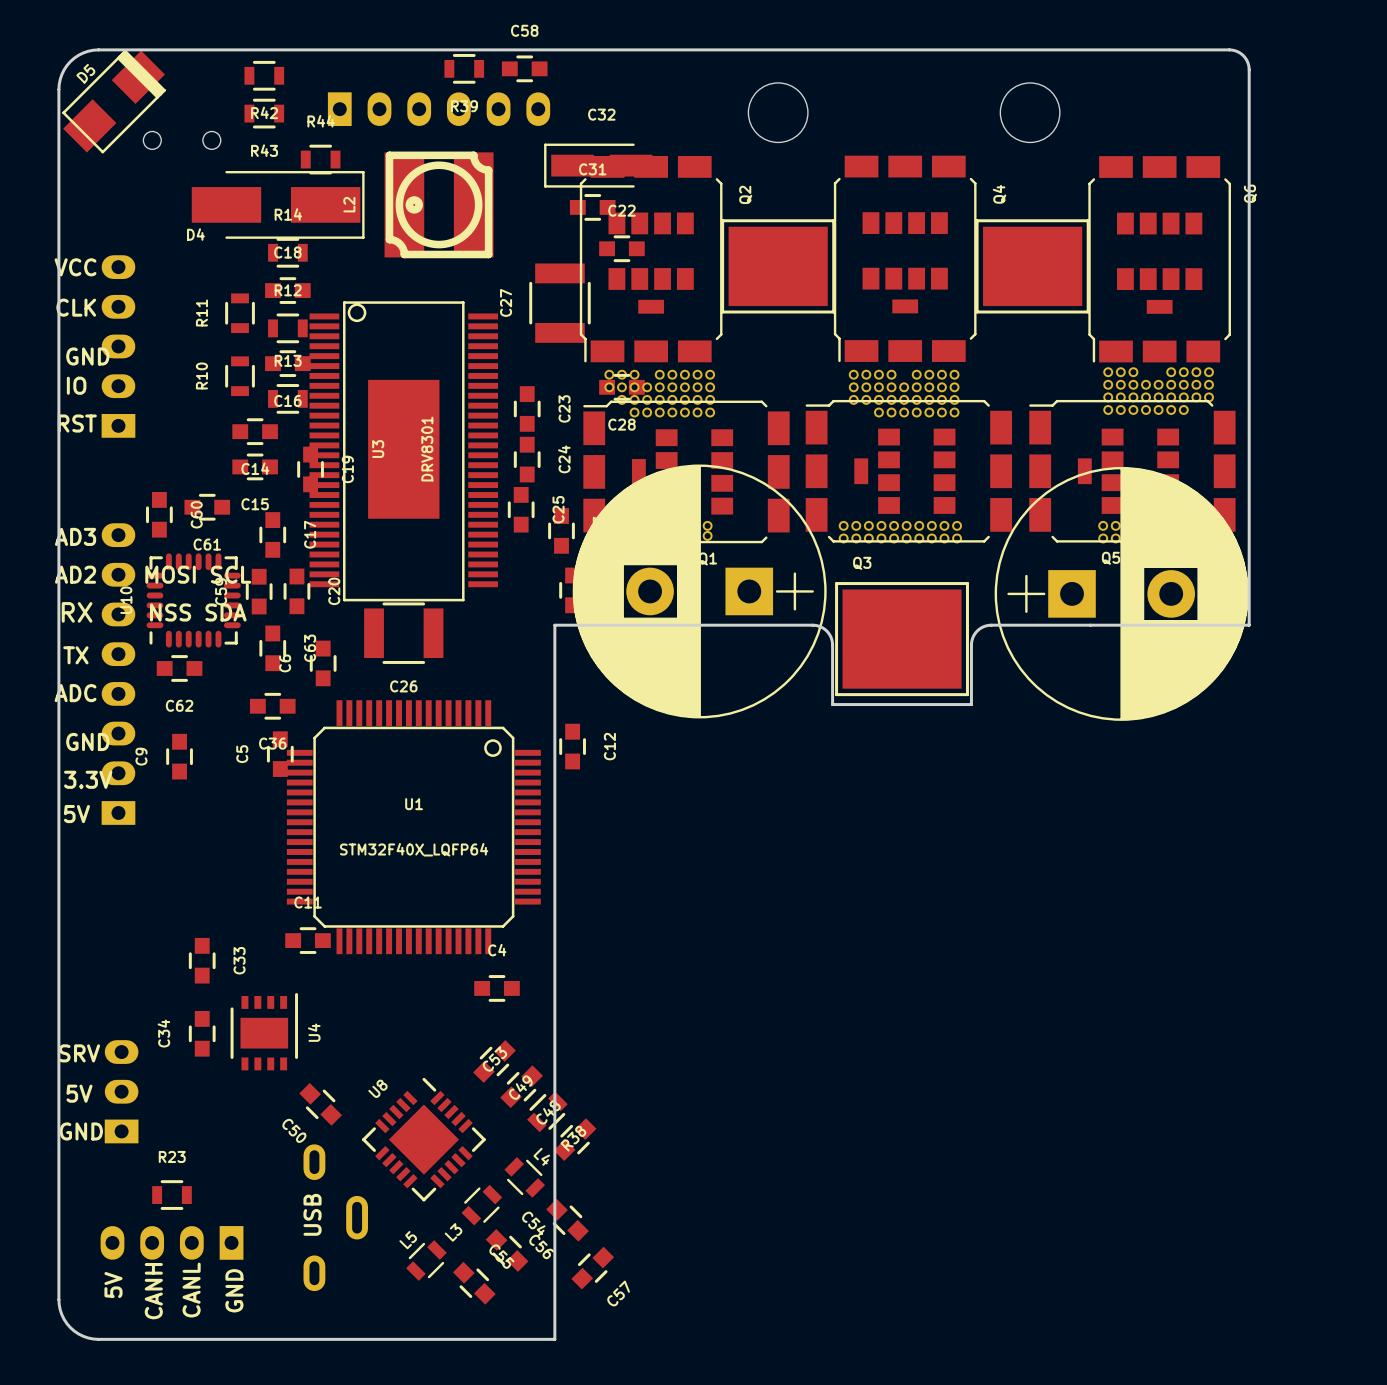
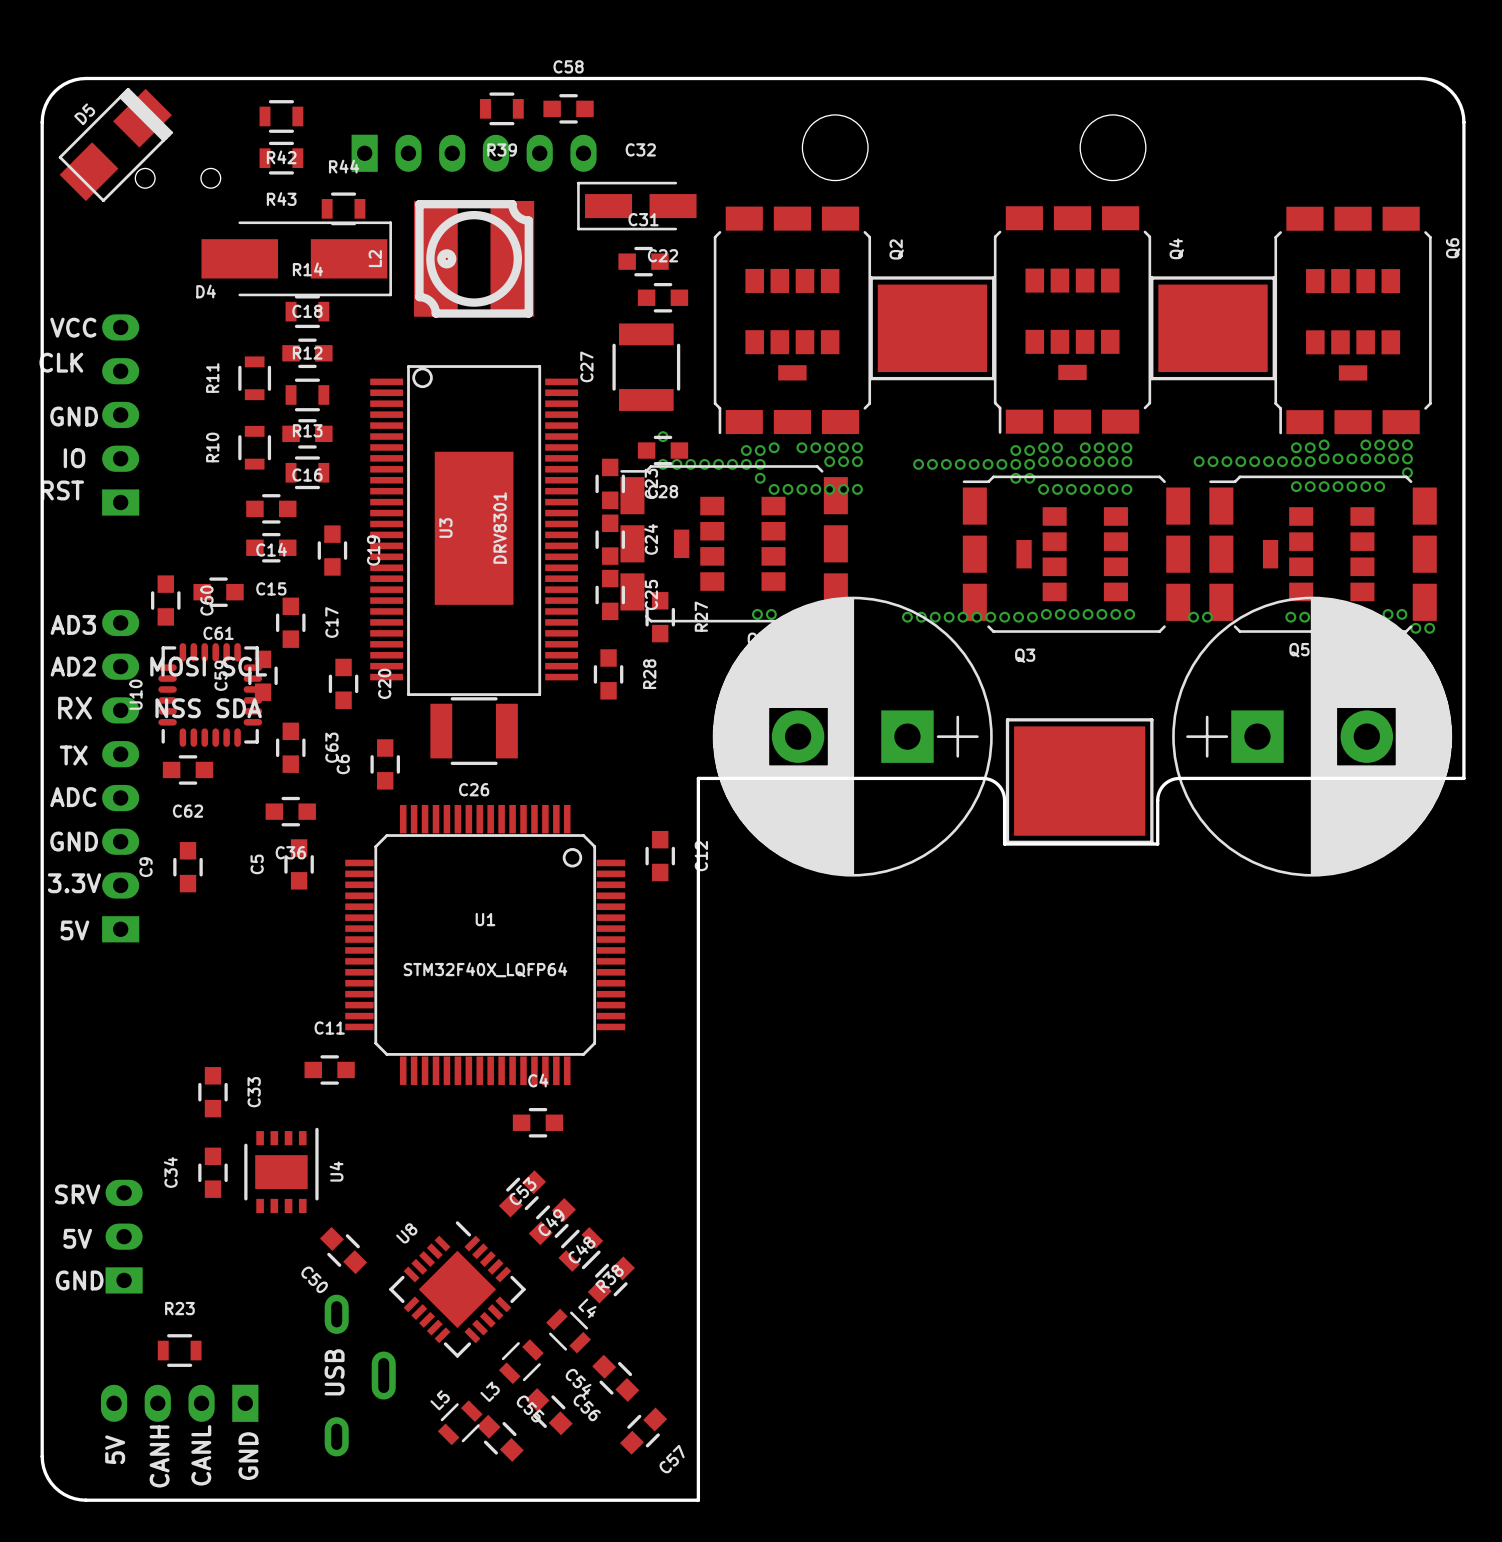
board edge: (1229, 49) (1236, 51) (1243, 55) (1247, 62) (1249, 69) (1249, 625) (986, 625) (975, 632) (971, 642) (971, 704) (832, 704) (831, 639) (826, 631) (815, 625) (554, 625) (554, 1339) -> (1332, 78) (1431, 79) (1451, 91) (1460, 105) (1463, 116) (1463, 778) (1173, 779) (1164, 784) (1158, 794) (1157, 844) (1004, 844) (1003, 794) (998, 784) (985, 778) (698, 778) (698, 1500) (589, 1500)
R39 position: (464, 68) -> (501, 108)
C58 position: (524, 68) -> (568, 108)
R42 position: (264, 75) -> (281, 116)
D5 position: (114, 101) -> (115, 144)
part position: (439, 109) -> (474, 153)
R43 position: (264, 113) -> (281, 158)
R44 position: (320, 159) -> (343, 208)
D4 position: (278, 204) -> (296, 258)
L2 position: (439, 204) -> (474, 258)
C31 position: (592, 207) -> (643, 261)
R14 position: (287, 252) -> (307, 311)
Q4 position: (905, 258) -> (1072, 320)
Q2 position: (651, 259) -> (792, 320)
Q6 position: (1159, 259) -> (1353, 320)
part: (778, 266) -> none
part: (1032, 266) -> none
text position: VCC (75, 267) -> VCC (73, 327)
part: none -> (932, 328)
part: none -> (1213, 328)
C18 position: (287, 290) -> (307, 353)
C27 position: (559, 303) -> (646, 367)
R11 position: (240, 313) -> (254, 378)
R12 position: (287, 328) -> (307, 394)
part position: (118, 346) -> (120, 414)
C16 position: (287, 363) -> (307, 433)
part: (1108, 372) -> none
part: (1120, 372) -> none
part: (1133, 372) -> none
part: (1171, 372) -> none
part: (1183, 372) -> none
part: (1196, 372) -> none
part: (1208, 372) -> none
part: (609, 374) -> none
part: (634, 374) -> none
part: (659, 374) -> none
part: (672, 374) -> none
part: (684, 374) -> none
part: (697, 374) -> none
part: (710, 374) -> none
part: (853, 374) -> none
part: (866, 374) -> none
part: (878, 374) -> none
part: (891, 374) -> none
part: (916, 374) -> none
part: (929, 374) -> none
part: (941, 374) -> none
part: (954, 374) -> none
R10 position: (240, 376) -> (254, 447)
part: none -> (1324, 444)
part: none -> (1365, 444)
part: none -> (1379, 444)
part: none -> (1393, 444)
part: none -> (1407, 444)
part: none -> (774, 447)
part: none -> (801, 447)
part: none -> (815, 447)
part: none -> (829, 447)
part: none -> (843, 447)
part: none -> (857, 447)
part: none -> (1043, 447)
part: none -> (1057, 447)
part: none -> (1085, 447)
part: none -> (1099, 447)
part: none -> (1113, 447)
part: none -> (1126, 447)
part: (1108, 384) -> none
part: (1120, 384) -> none
part: (1133, 384) -> none
part: (1146, 384) -> none
part: (1158, 384) -> none
part: (1171, 384) -> none
part: (1183, 384) -> none
text position: IO (76, 385) -> IO (74, 458)
part: (609, 387) -> none
part: (621, 387) -> none
part: (634, 387) -> none
part: (647, 387) -> none
part: (659, 387) -> none
part: (672, 387) -> none
part: (684, 387) -> none
part: (853, 387) -> none
part: (866, 387) -> none
part: (878, 387) -> none
part: (891, 387) -> none
part: (904, 387) -> none
part: (916, 387) -> none
part: (929, 387) -> none
part: none -> (1324, 458)
part: none -> (1338, 458)
part: none -> (1351, 458)
part: none -> (1365, 458)
part: none -> (1379, 458)
part: none -> (1393, 458)
part: none -> (1407, 458)
part: none -> (829, 461)
part: none -> (843, 461)
part: none -> (857, 461)
part: none -> (1043, 461)
part: none -> (1057, 461)
part: none -> (1071, 461)
part: none -> (1085, 461)
part: none -> (1099, 461)
part: none -> (1113, 461)
part: none -> (1126, 461)
R13 position: (287, 398) -> (307, 472)
part: none -> (1407, 472)
C23 position: (527, 408) -> (610, 483)
part: (1108, 409) -> none
part: (1120, 409) -> none
part: (1133, 409) -> none
part: (1146, 409) -> none
part: (1158, 409) -> none
part: (1171, 409) -> none
part: (1183, 409) -> none
part: (634, 412) -> none
part: (647, 412) -> none
part: (659, 412) -> none
part: (672, 412) -> none
part: (684, 412) -> none
part: (697, 412) -> none
part: (878, 412) -> none
part: (891, 412) -> none
part: (904, 412) -> none
part: (916, 412) -> none
part: (929, 412) -> none
part: none -> (1296, 486)
part: none -> (1310, 486)
part: none -> (1324, 486)
part: none -> (1338, 486)
part: none -> (1351, 486)
part: none -> (1365, 486)
part: none -> (1379, 486)
part: none -> (774, 489)
part: none -> (788, 489)
part: none -> (801, 489)
part: none -> (815, 489)
part: none -> (829, 489)
part: none -> (843, 489)
part: none -> (857, 489)
part: none -> (1043, 489)
part: none -> (1057, 489)
part: none -> (1071, 489)
part: none -> (1085, 489)
part: none -> (1099, 489)
part: none -> (1113, 489)
part: none -> (1126, 489)
C14 position: (255, 431) -> (271, 508)
U3 position: (403, 451) -> (474, 530)
C24 position: (527, 459) -> (610, 539)
C15 position: (255, 466) -> (271, 547)
C19 position: (310, 469) -> (332, 550)
Q3 position: (908, 471) -> (1076, 554)
Q5 position: (1132, 471) -> (1322, 554)
C61 position: (207, 507) -> (218, 592)
C25 position: (521, 509) -> (610, 594)
C60 position: (159, 514) -> (165, 600)
part: (707, 525) -> none
part: (843, 525) -> none
part: (856, 525) -> none
part: (868, 525) -> none
part: (881, 525) -> none
part: (894, 525) -> none
part: (906, 525) -> none
part: (919, 525) -> none
part: (931, 525) -> none
part: (944, 525) -> none
part: (957, 525) -> none
part: (1103, 525) -> none
part: (1115, 525) -> none
R27 position: (561, 530) -> (660, 617)
C17 position: (272, 534) -> (290, 622)
part: none -> (771, 614)
part: none -> (1046, 614)
part: none -> (1060, 614)
part: none -> (1074, 614)
part: none -> (1088, 614)
part: none -> (1101, 614)
part: none -> (1115, 614)
part: none -> (1129, 614)
part: none -> (1388, 614)
part: none -> (1401, 614)
text position: AD3 (75, 536) -> AD3 (73, 624)
part: none -> (1415, 628)
part: none -> (1429, 628)
text position: AD2 (75, 574) -> AD2 (73, 666)
text position: MOSI SCL (198, 574) -> MOSI SCL (208, 666)
C20 position: (296, 591) -> (343, 683)
part position: (699, 591) -> (852, 736)
part position: (1121, 593) -> (1312, 736)
U10 position: (193, 600) -> (210, 694)
text position: RX (77, 612) -> RX (75, 708)
text position: NSS SDA (198, 612) -> NSS SDA (208, 708)
C26 position: (403, 633) -> (474, 731)
part position: (902, 639) -> (1079, 781)
C63 position: (272, 648) -> (290, 747)
text position: TX (75, 655) -> TX (73, 755)
C6 position: (323, 663) -> (385, 764)
C62 position: (179, 668) -> (188, 769)
part position: (118, 674) -> (120, 776)
text position: ADC (75, 693) -> ADC (73, 797)
C36 position: (272, 706) -> (290, 811)
C12 position: (572, 746) -> (660, 856)
C5 position: (280, 754) -> (299, 864)
C9 position: (179, 756) -> (188, 867)
text position: 5V (76, 814) -> 5V (74, 930)
U1 position: (413, 827) -> (485, 944)
C11 position: (308, 940) -> (329, 1069)
C33 position: (202, 960) -> (213, 1092)
C4 position: (497, 988) -> (538, 1122)
U4 position: (264, 1031) -> (281, 1170)
C34 position: (202, 1033) -> (213, 1172)
text position: SRV (79, 1053) -> SRV (77, 1194)
part position: (121, 1091) -> (124, 1236)
text position: 5V (79, 1093) -> 5V (77, 1238)
C50 position: (320, 1104) -> (343, 1250)
text position: GND (81, 1131) -> GND (79, 1280)
U8 position: (423, 1139) -> (457, 1289)
L4 position: (524, 1177) -> (568, 1331)
R23 position: (171, 1195) -> (179, 1350)
L3 position: (481, 1205) -> (521, 1361)
text position: USB (312, 1214) -> USB (334, 1372)
part position: (335, 1217) -> (360, 1375)
C56 position: (567, 1220) -> (615, 1378)
part position: (172, 1242) -> (179, 1403)
C54 position: (507, 1250) -> (549, 1411)
L5 position: (426, 1260) -> (460, 1422)
C57 position: (592, 1268) -> (643, 1431)
text position: 5V (113, 1285) -> 5V (115, 1449)
text position: CANL (191, 1290) -> CANL (201, 1455)
text position: GND (234, 1290) -> GND (248, 1456)
text position: CANH (153, 1291) -> CANH (159, 1456)

